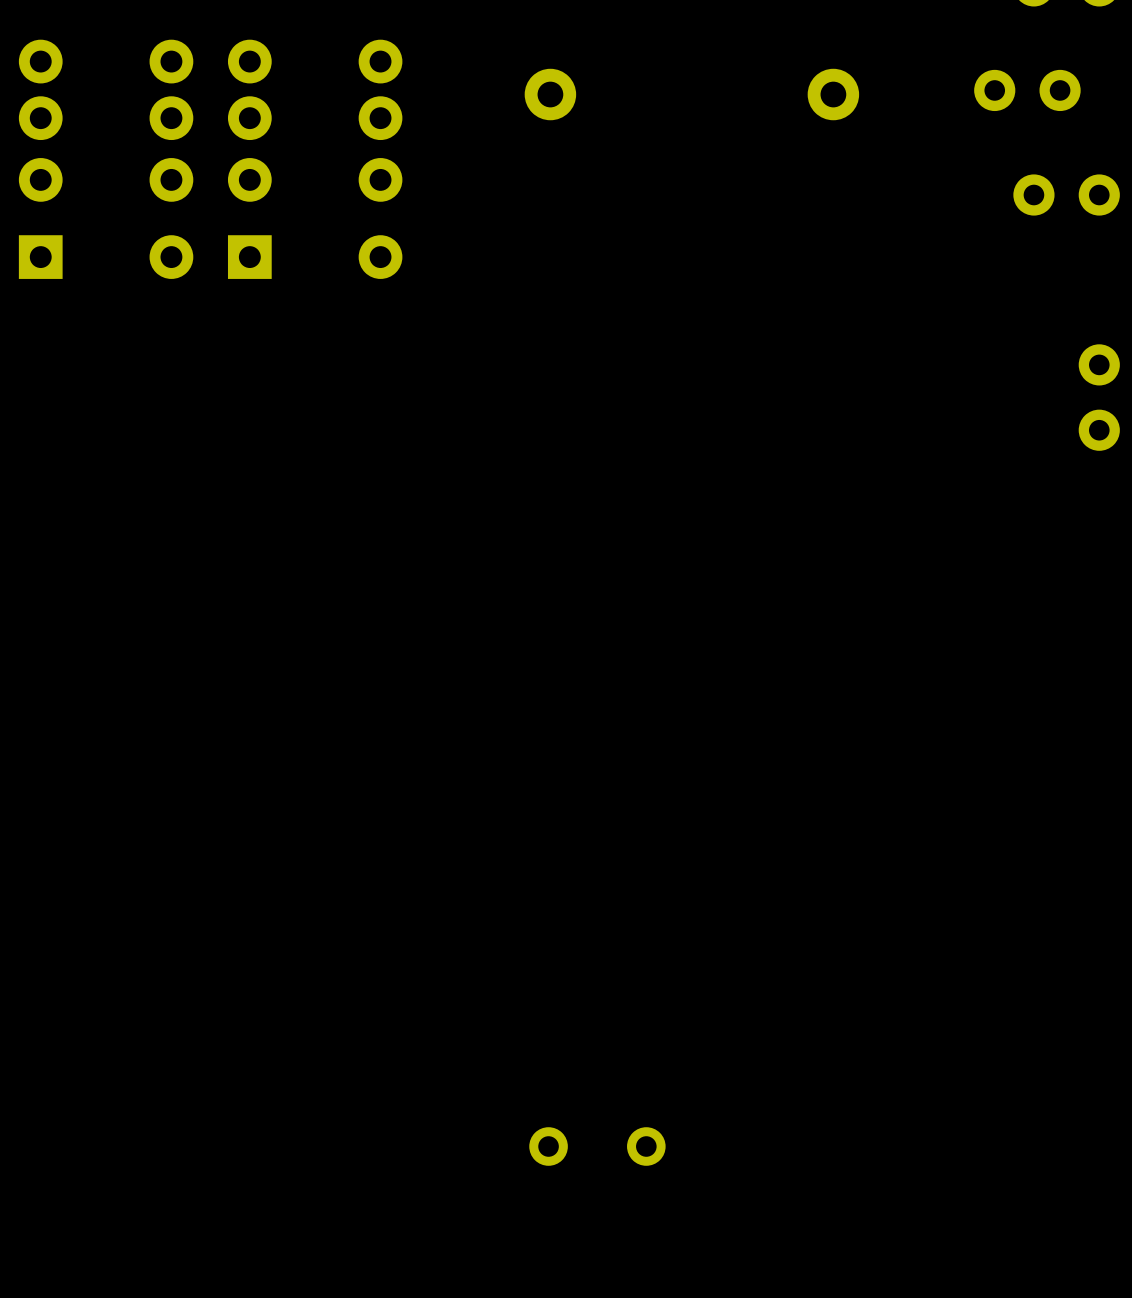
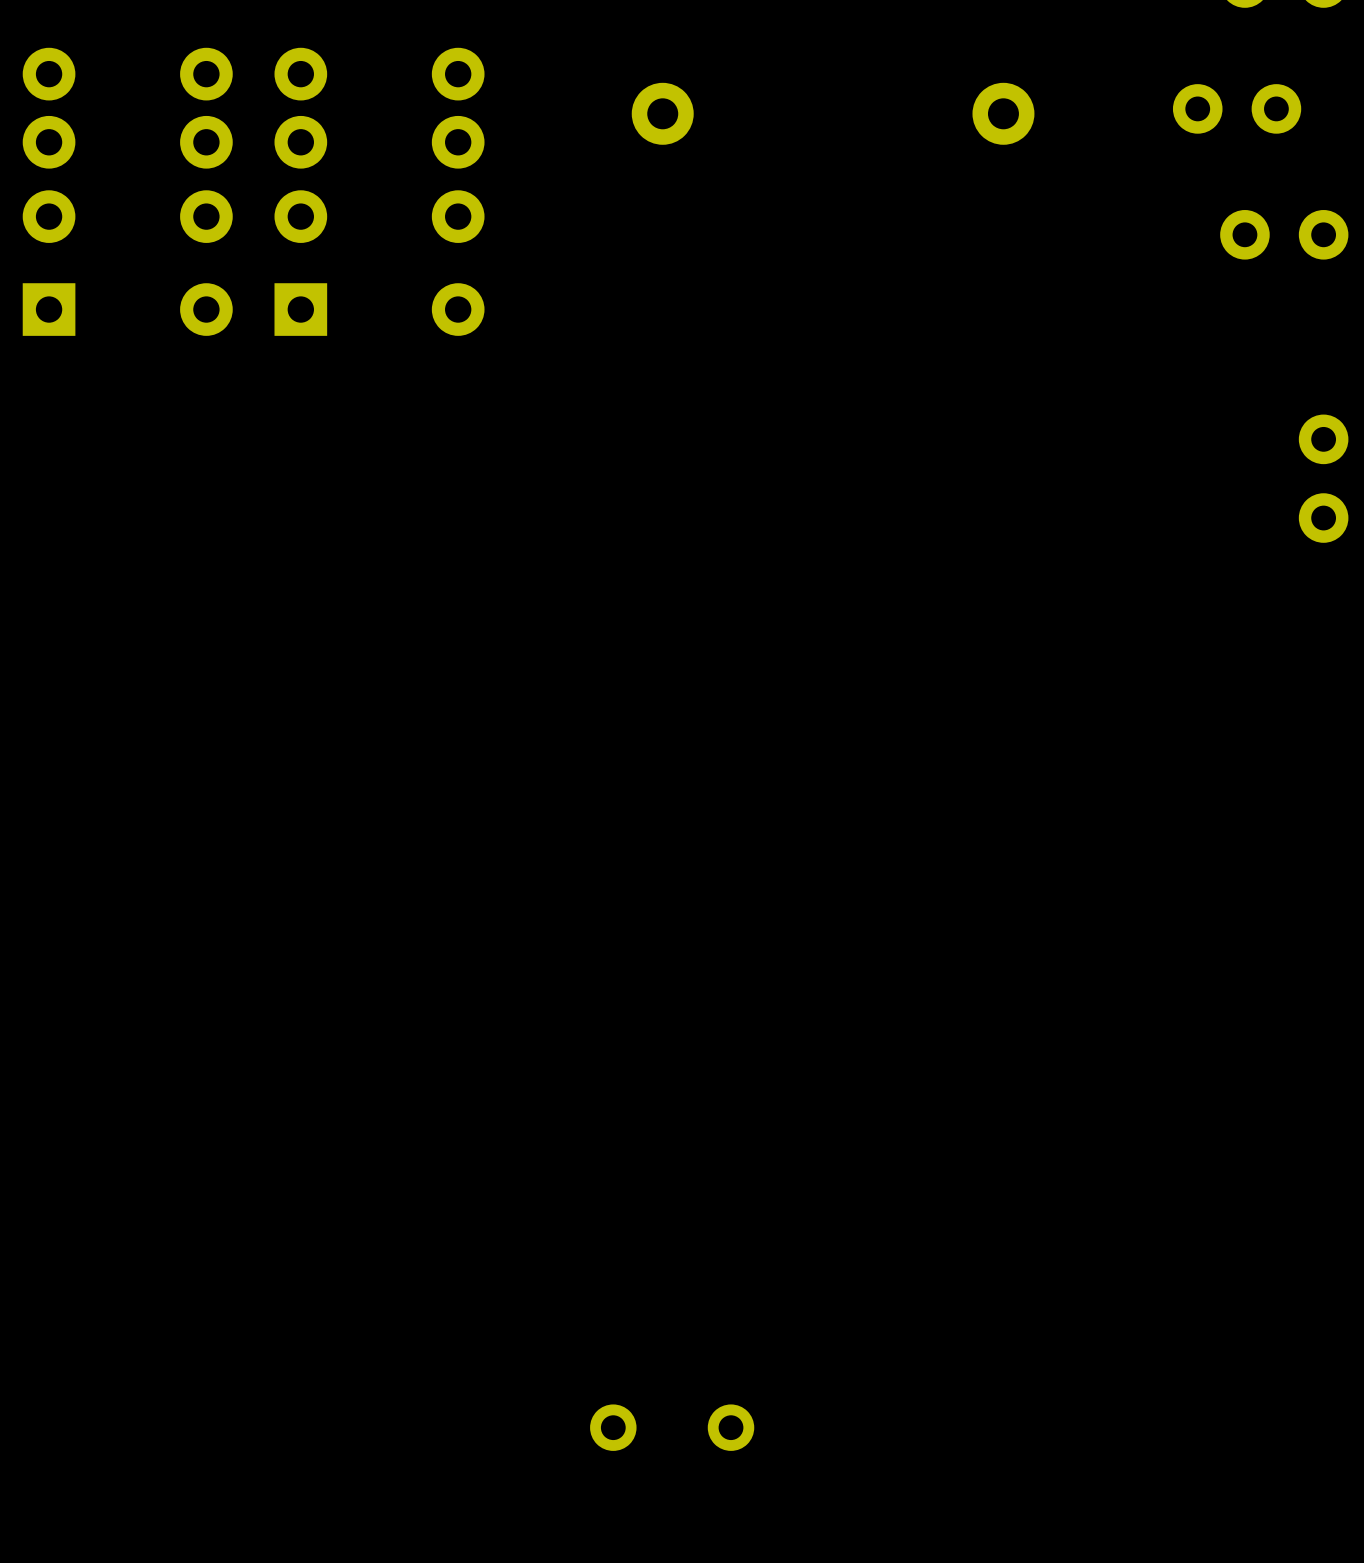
part position: (597, 1146) -> (672, 1427)

